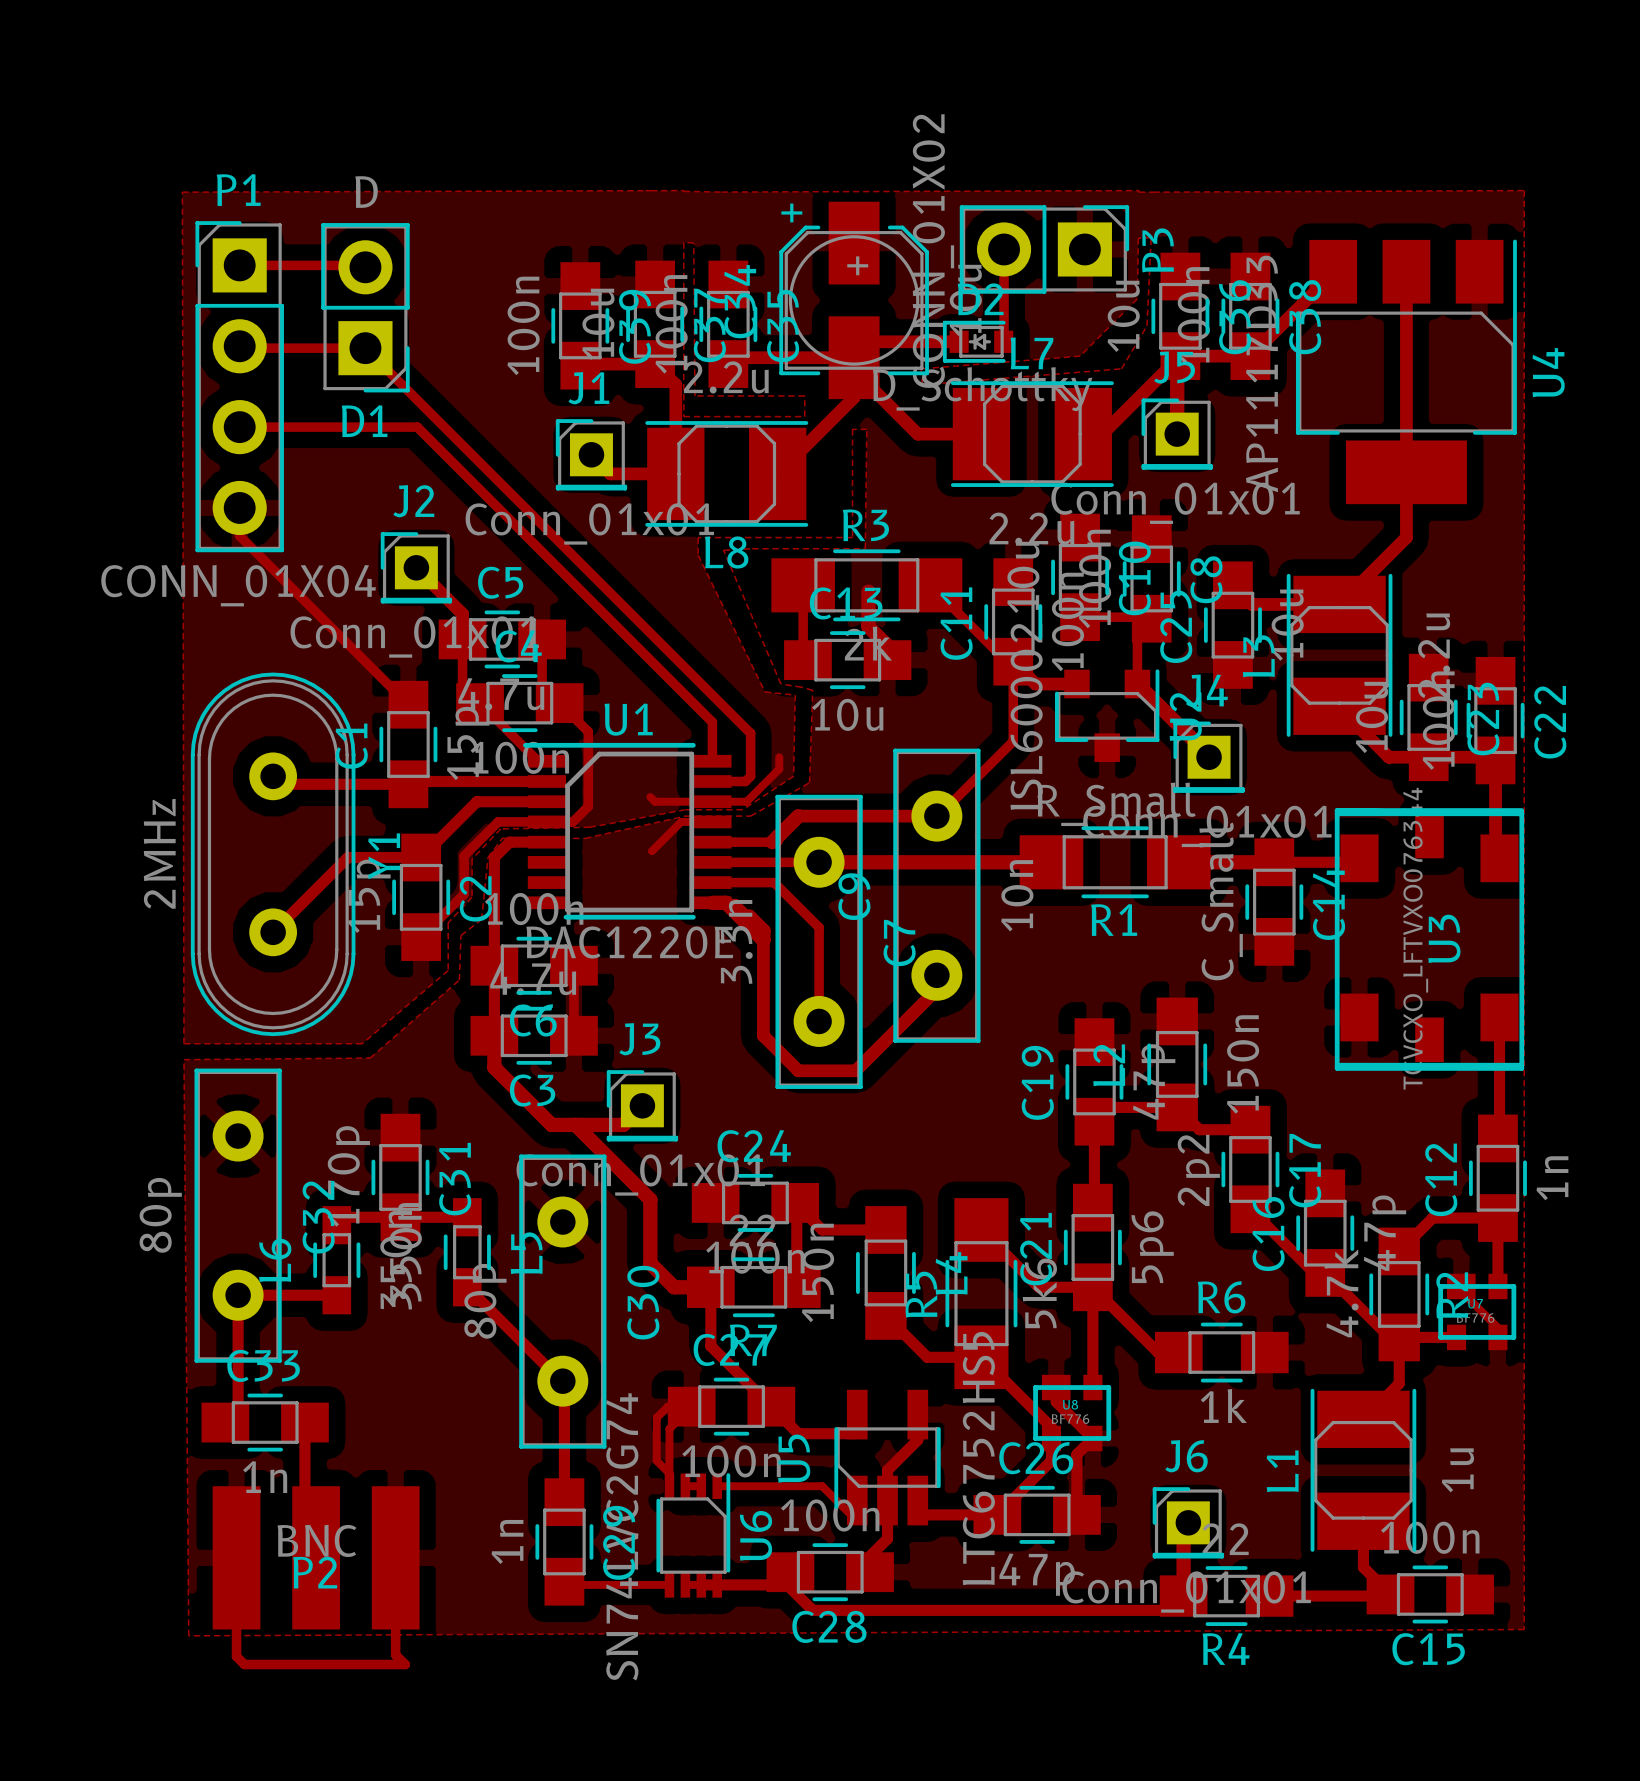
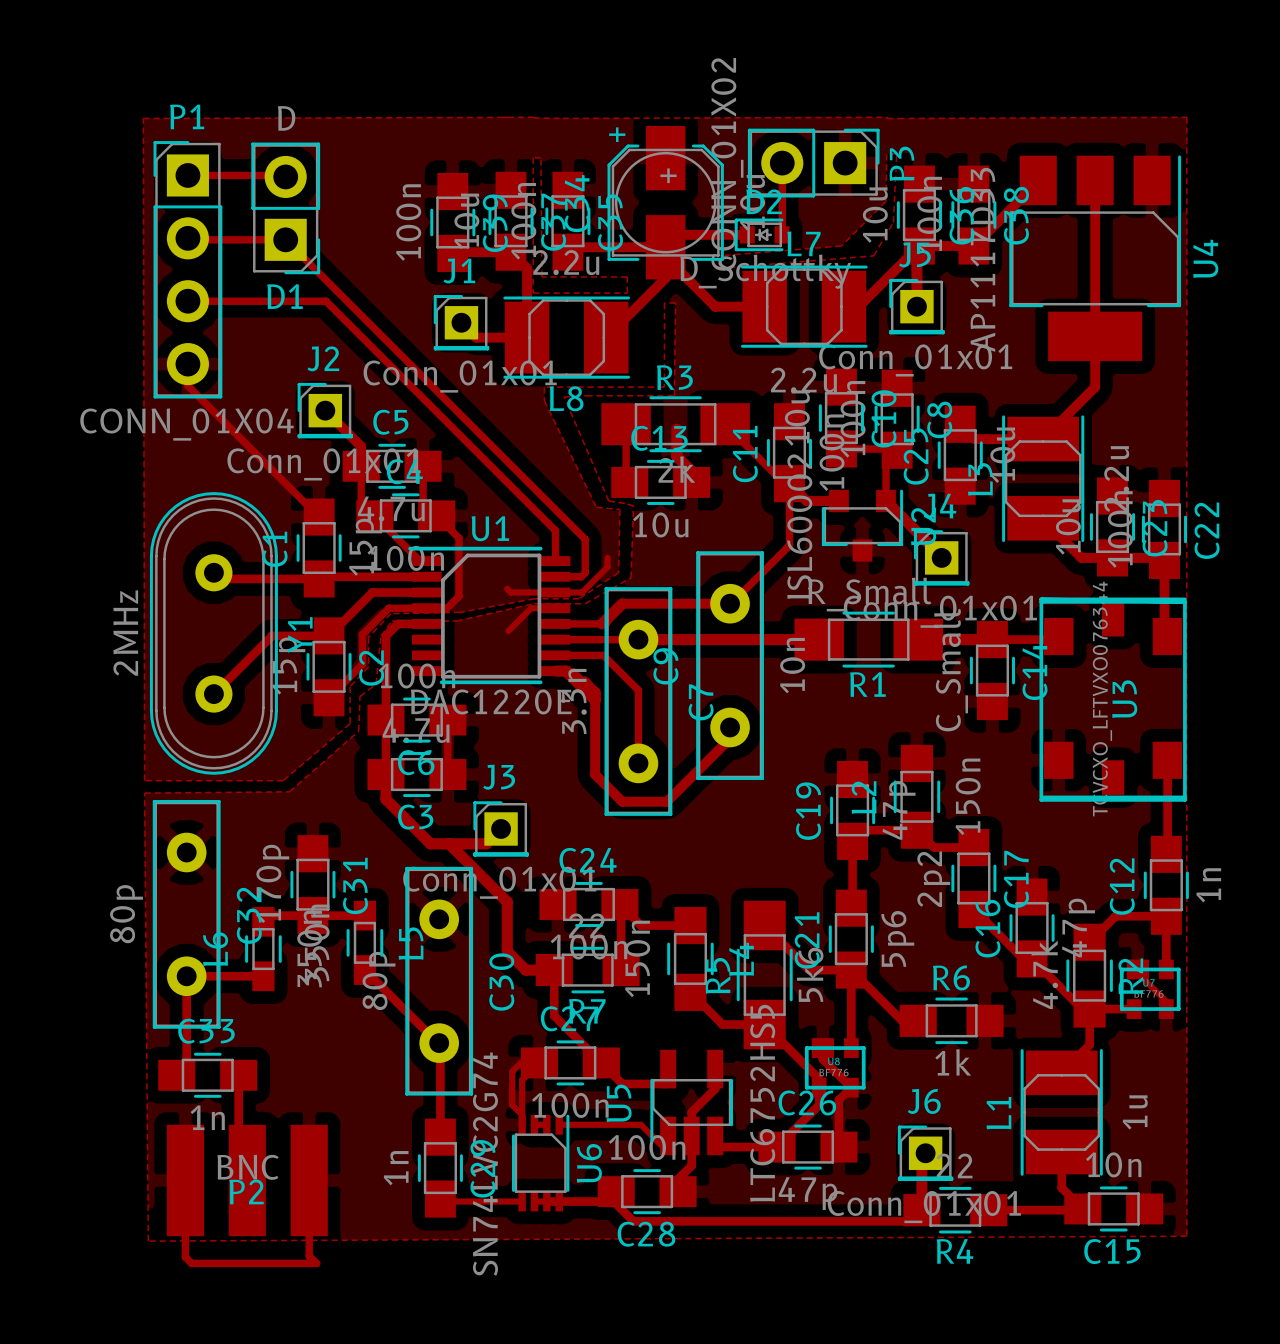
C15 value: 100n (1430, 1537) -> 10n (1113, 1164)

